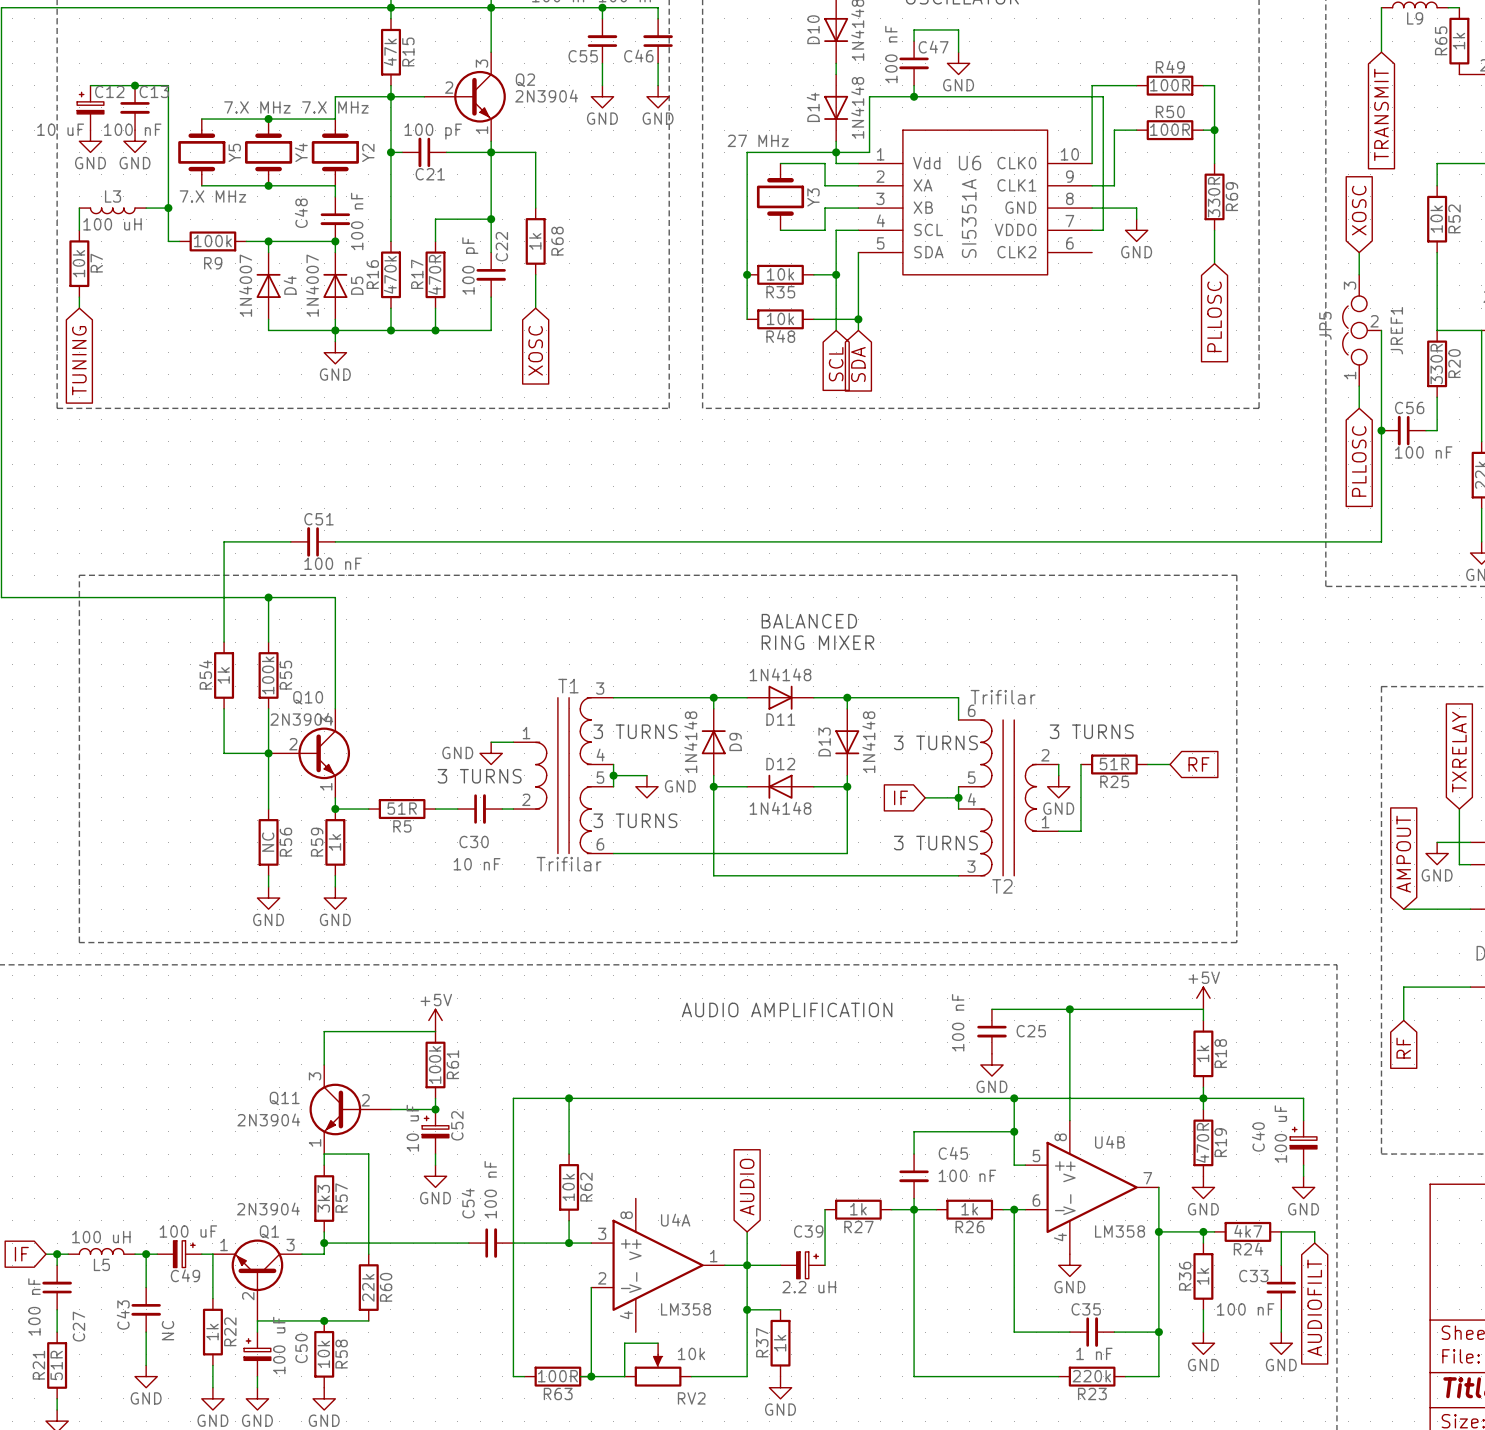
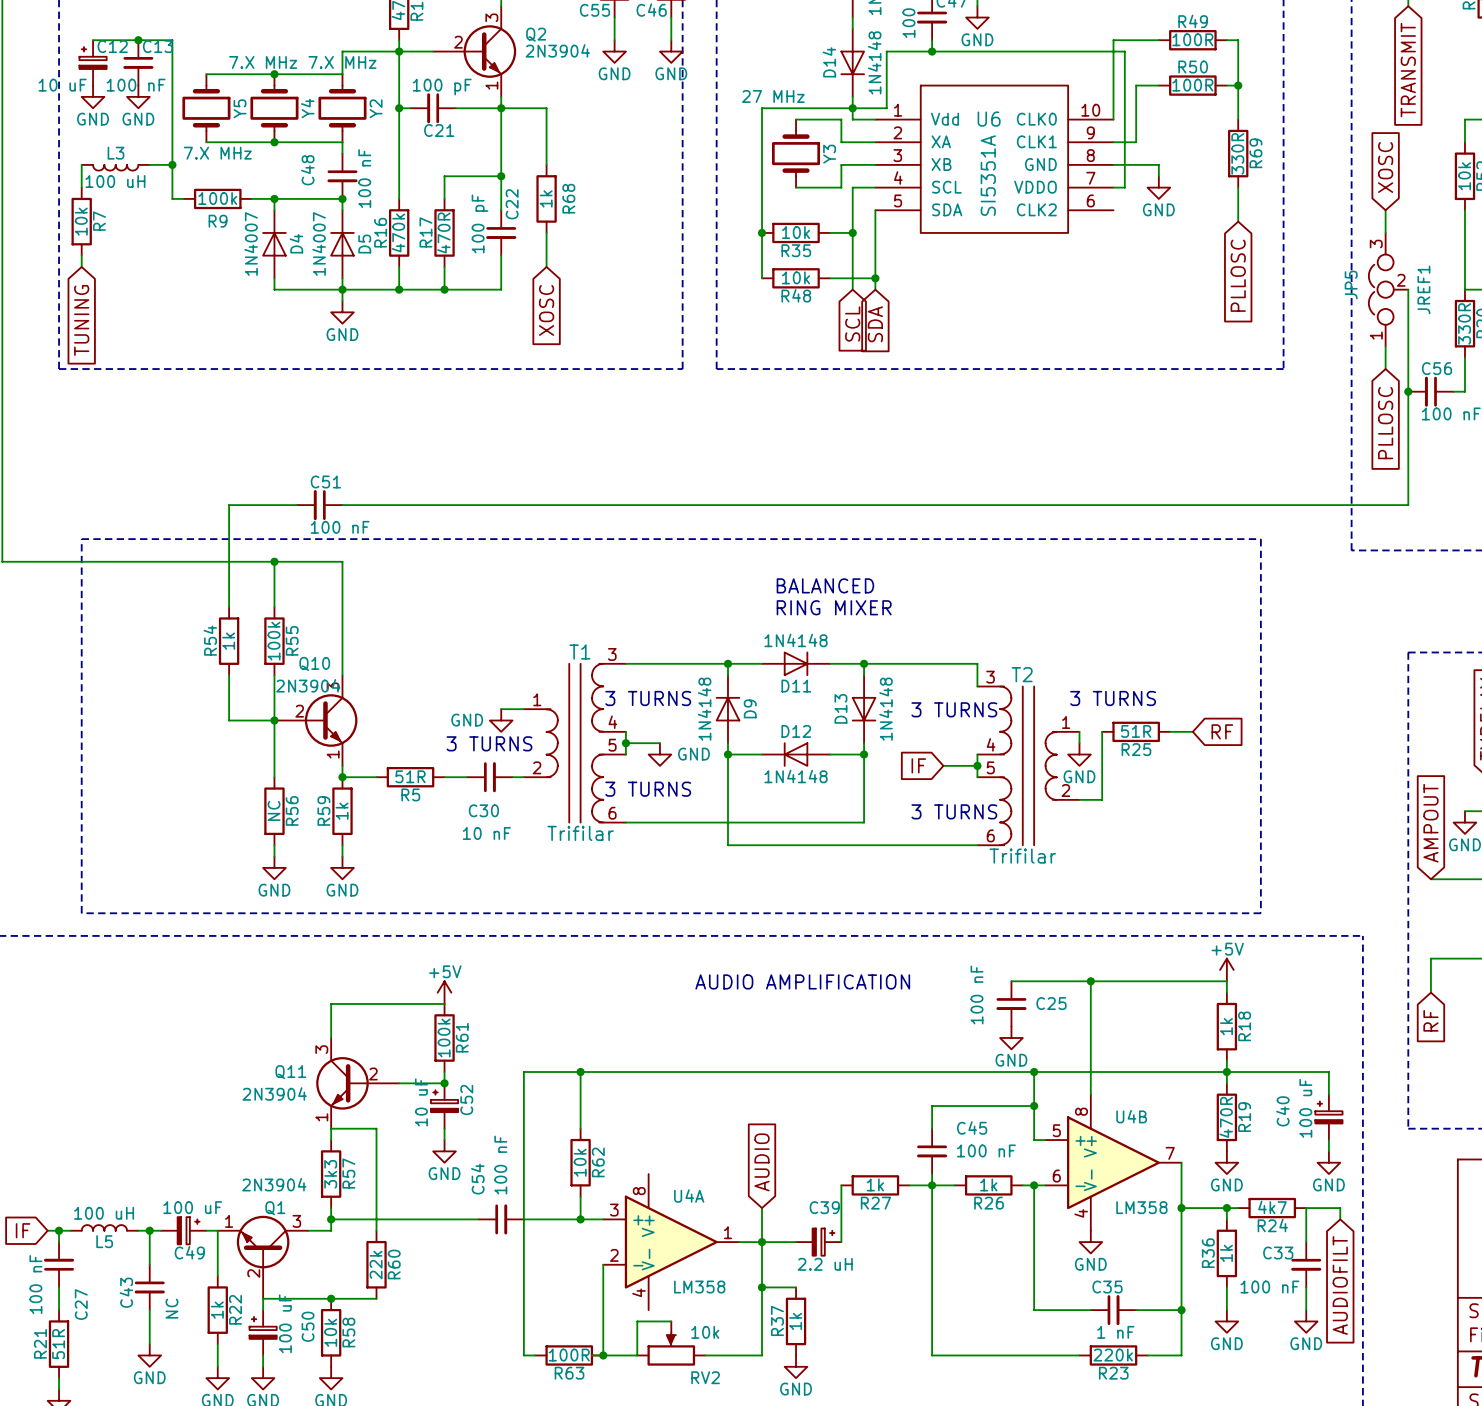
T2 flip: as is (1008, 797) -> up-down (1028, 765)

